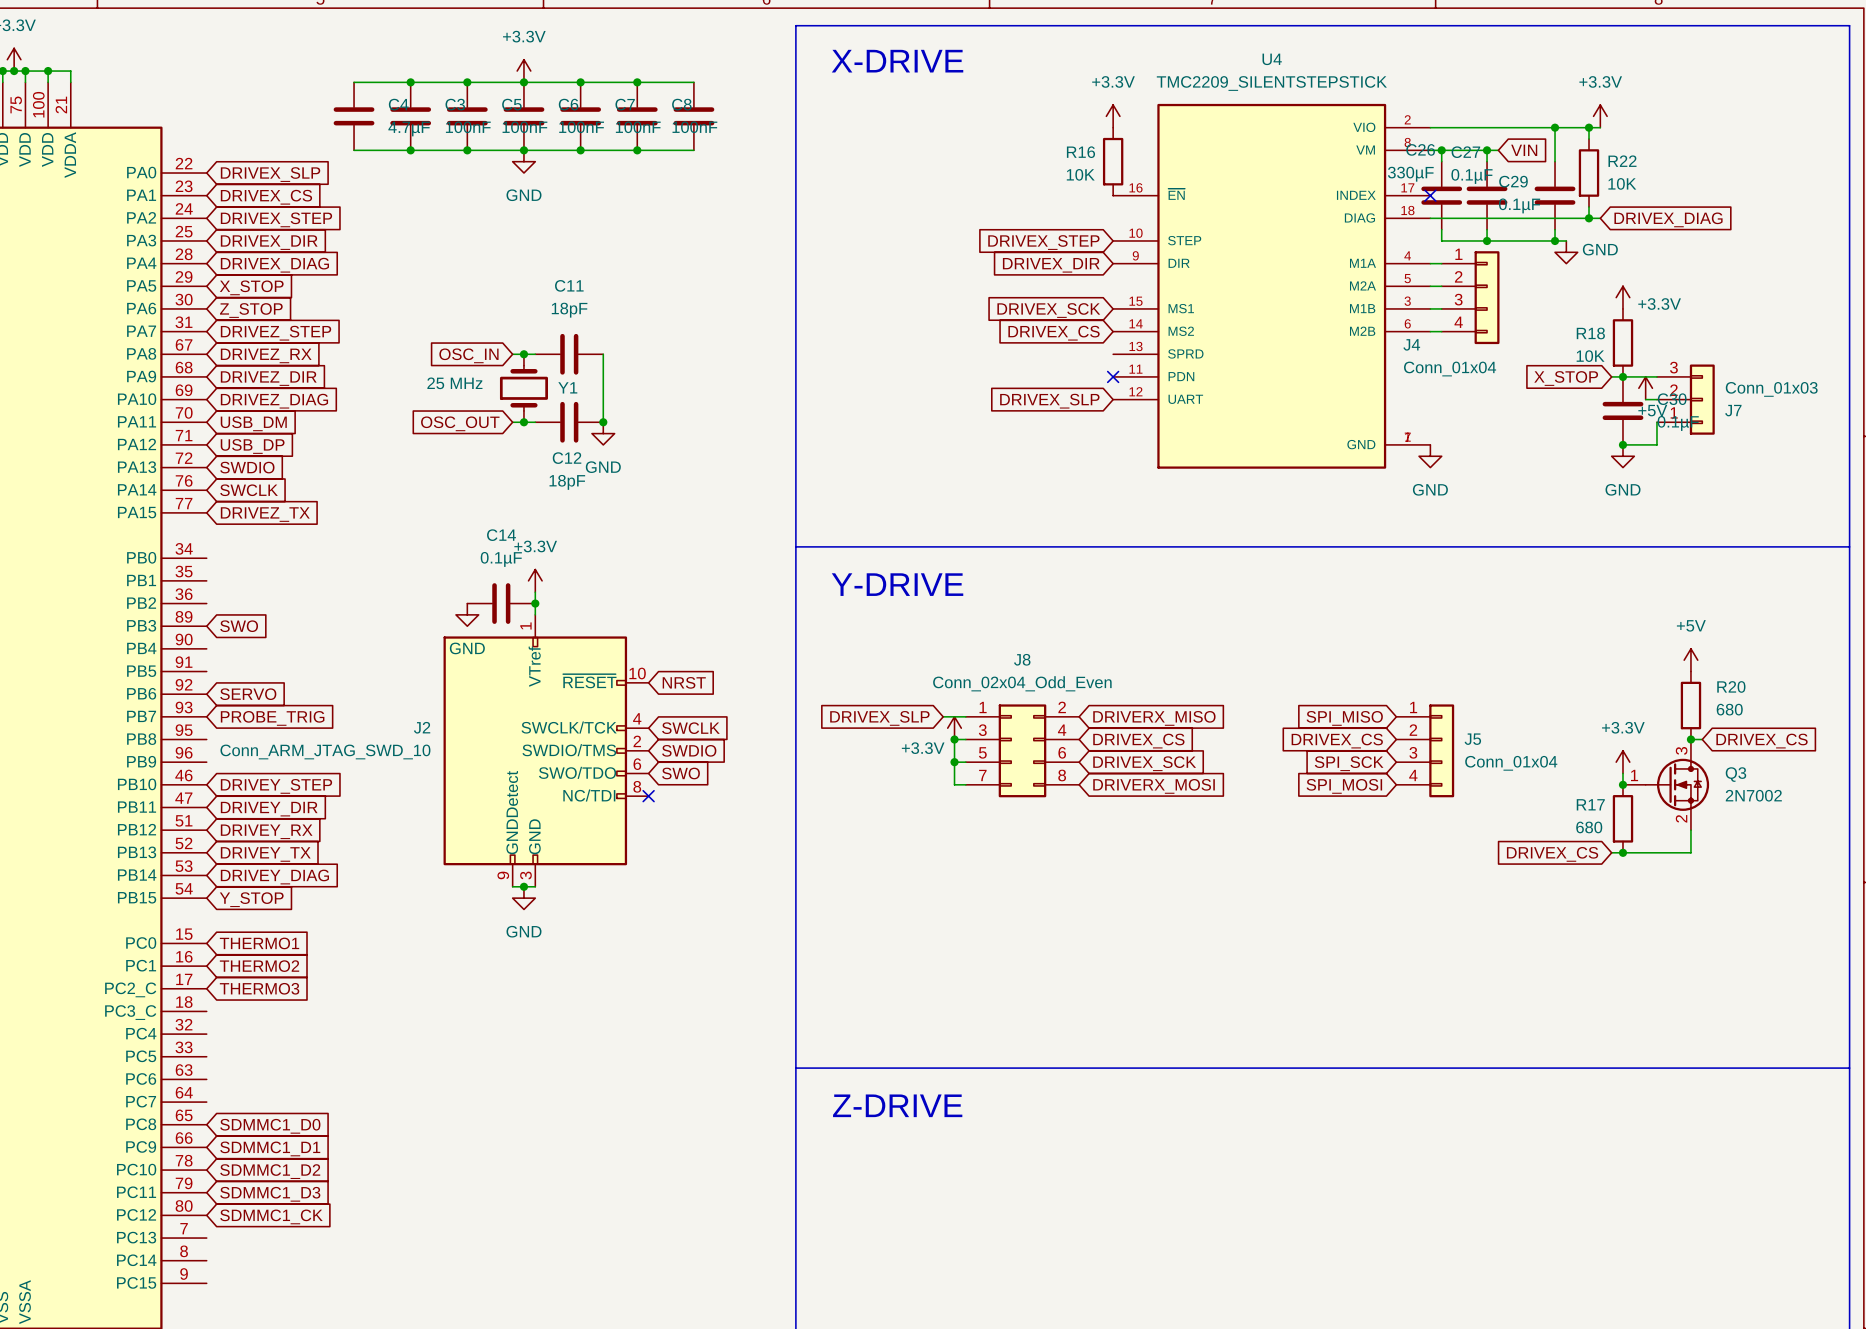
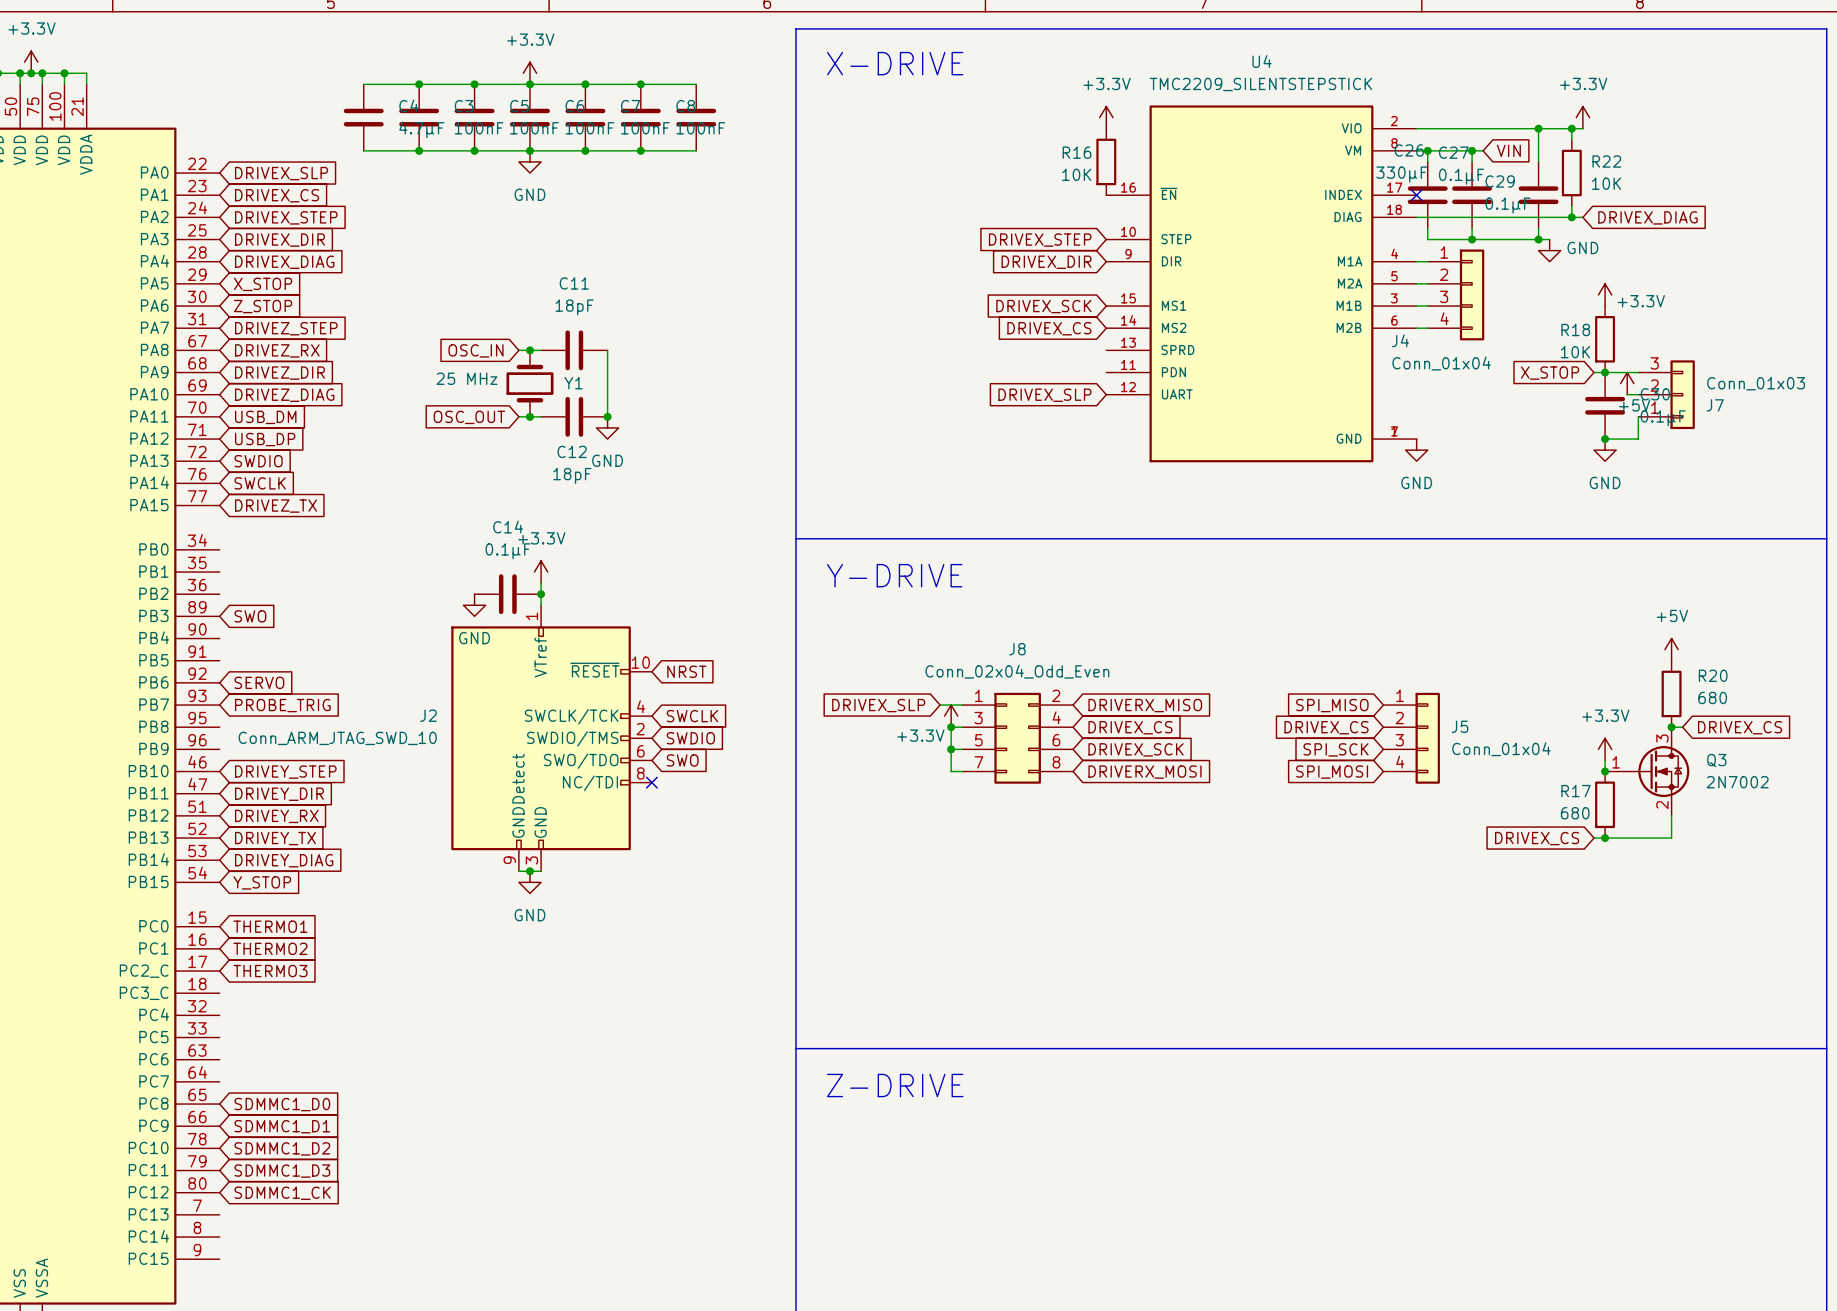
no-connect mark: (1113, 376) -> none

